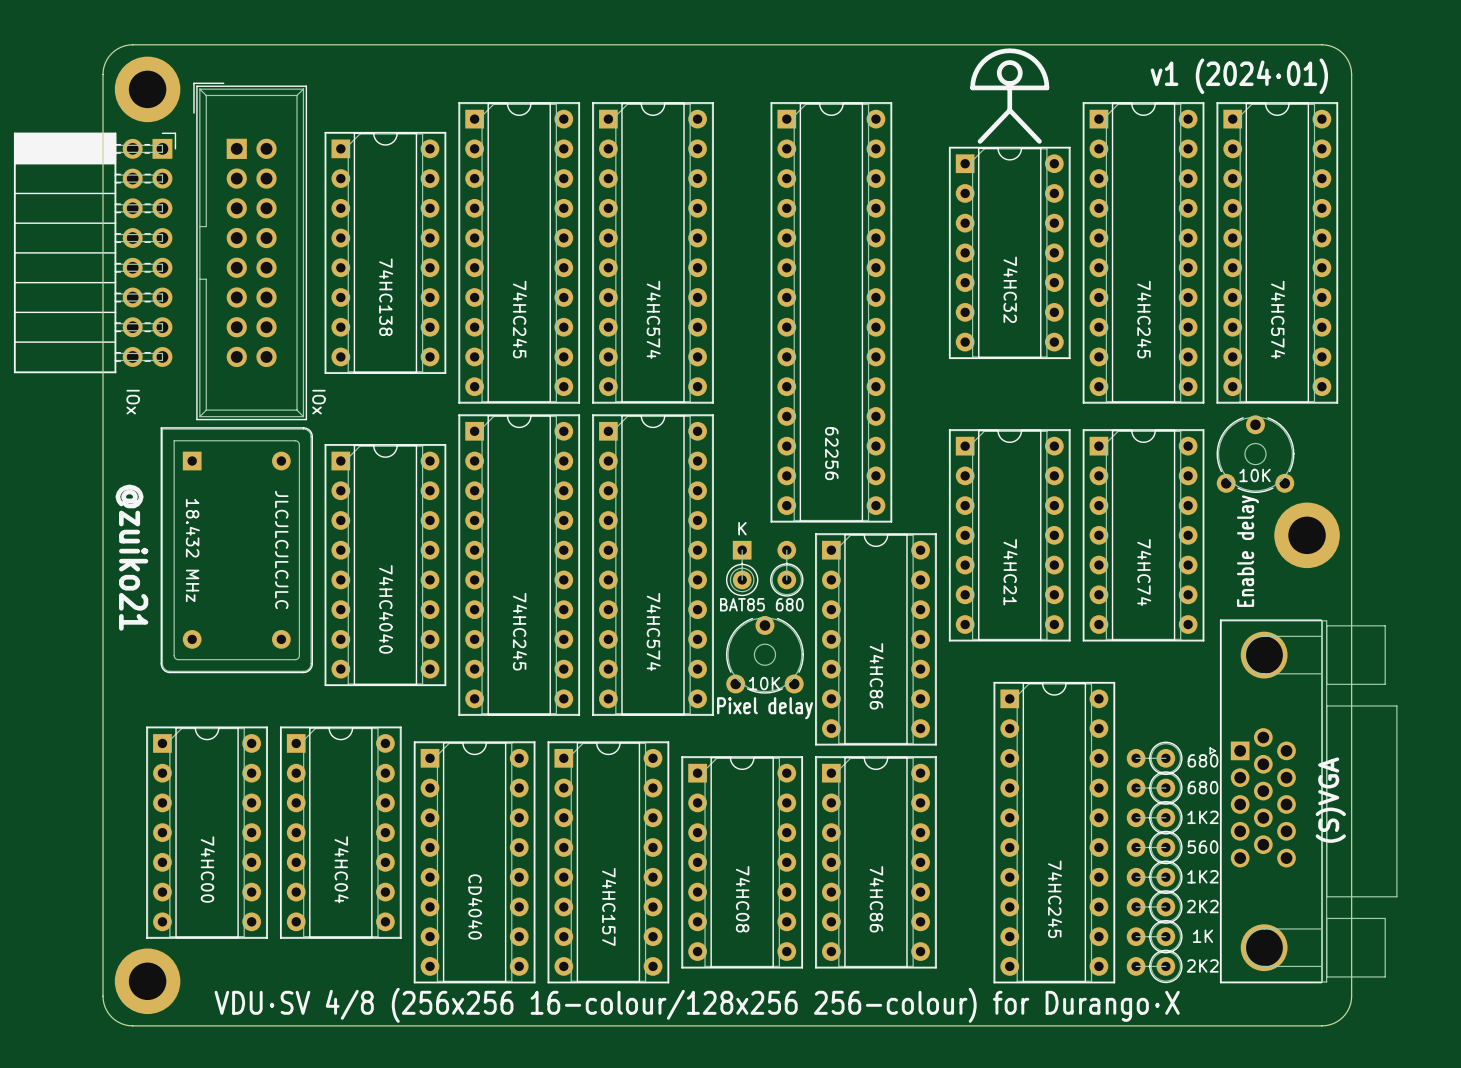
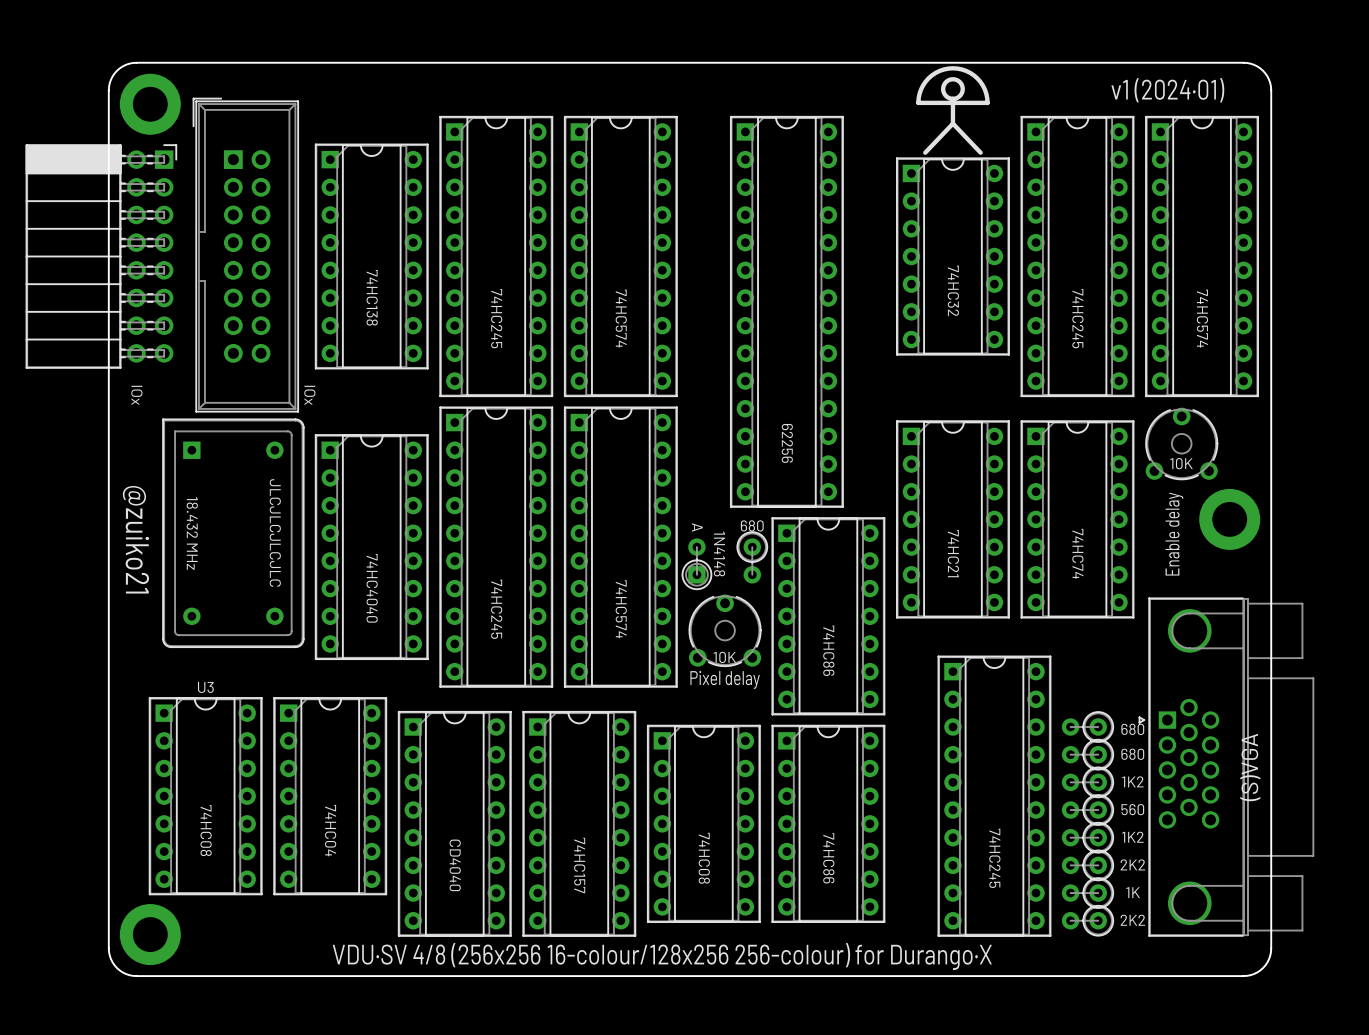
part: BAT85 (742, 568) -> none
part rotation: 0° (786, 568) -> 180° (752, 557)
part: none -> 1N4148 (696, 564)
U3 name: none -> U3 (205, 687)
U3 value: 74HC00 (207, 869) -> 74HC08 (206, 830)

